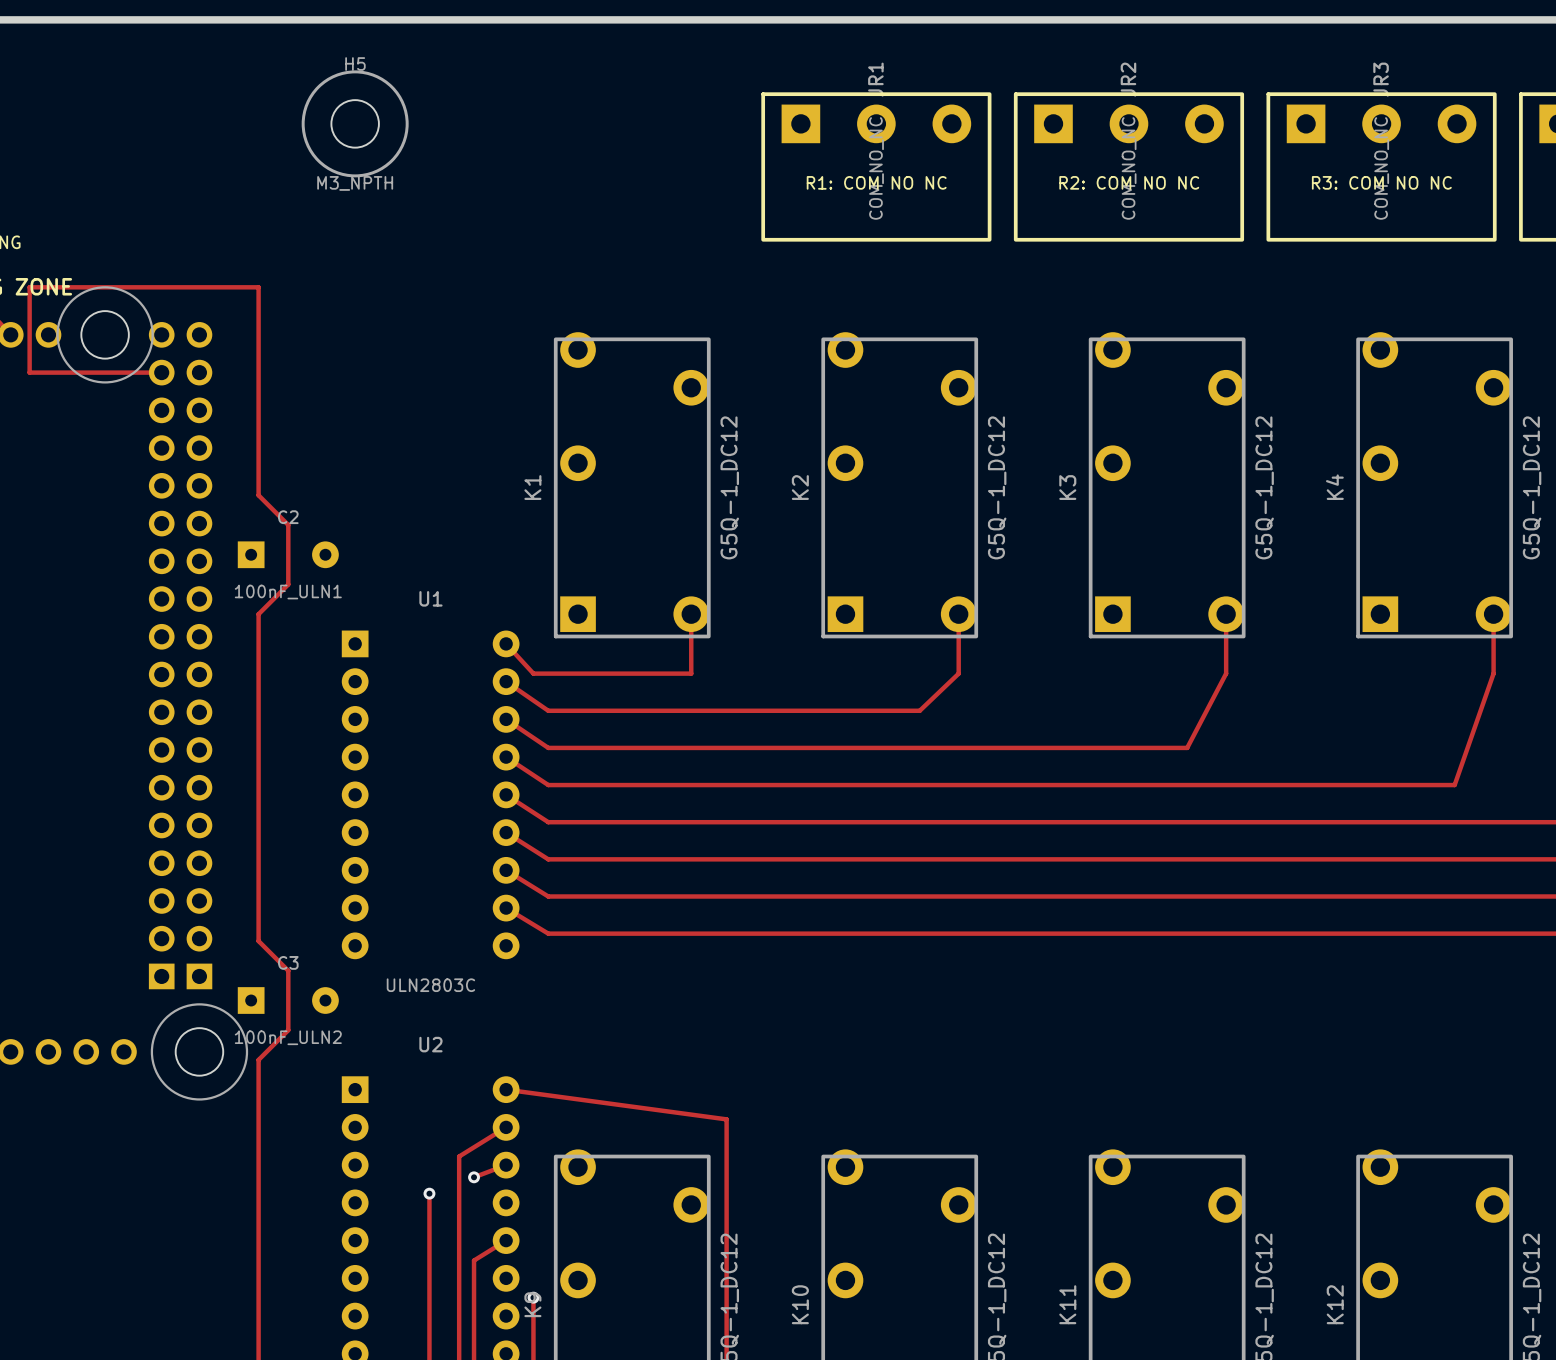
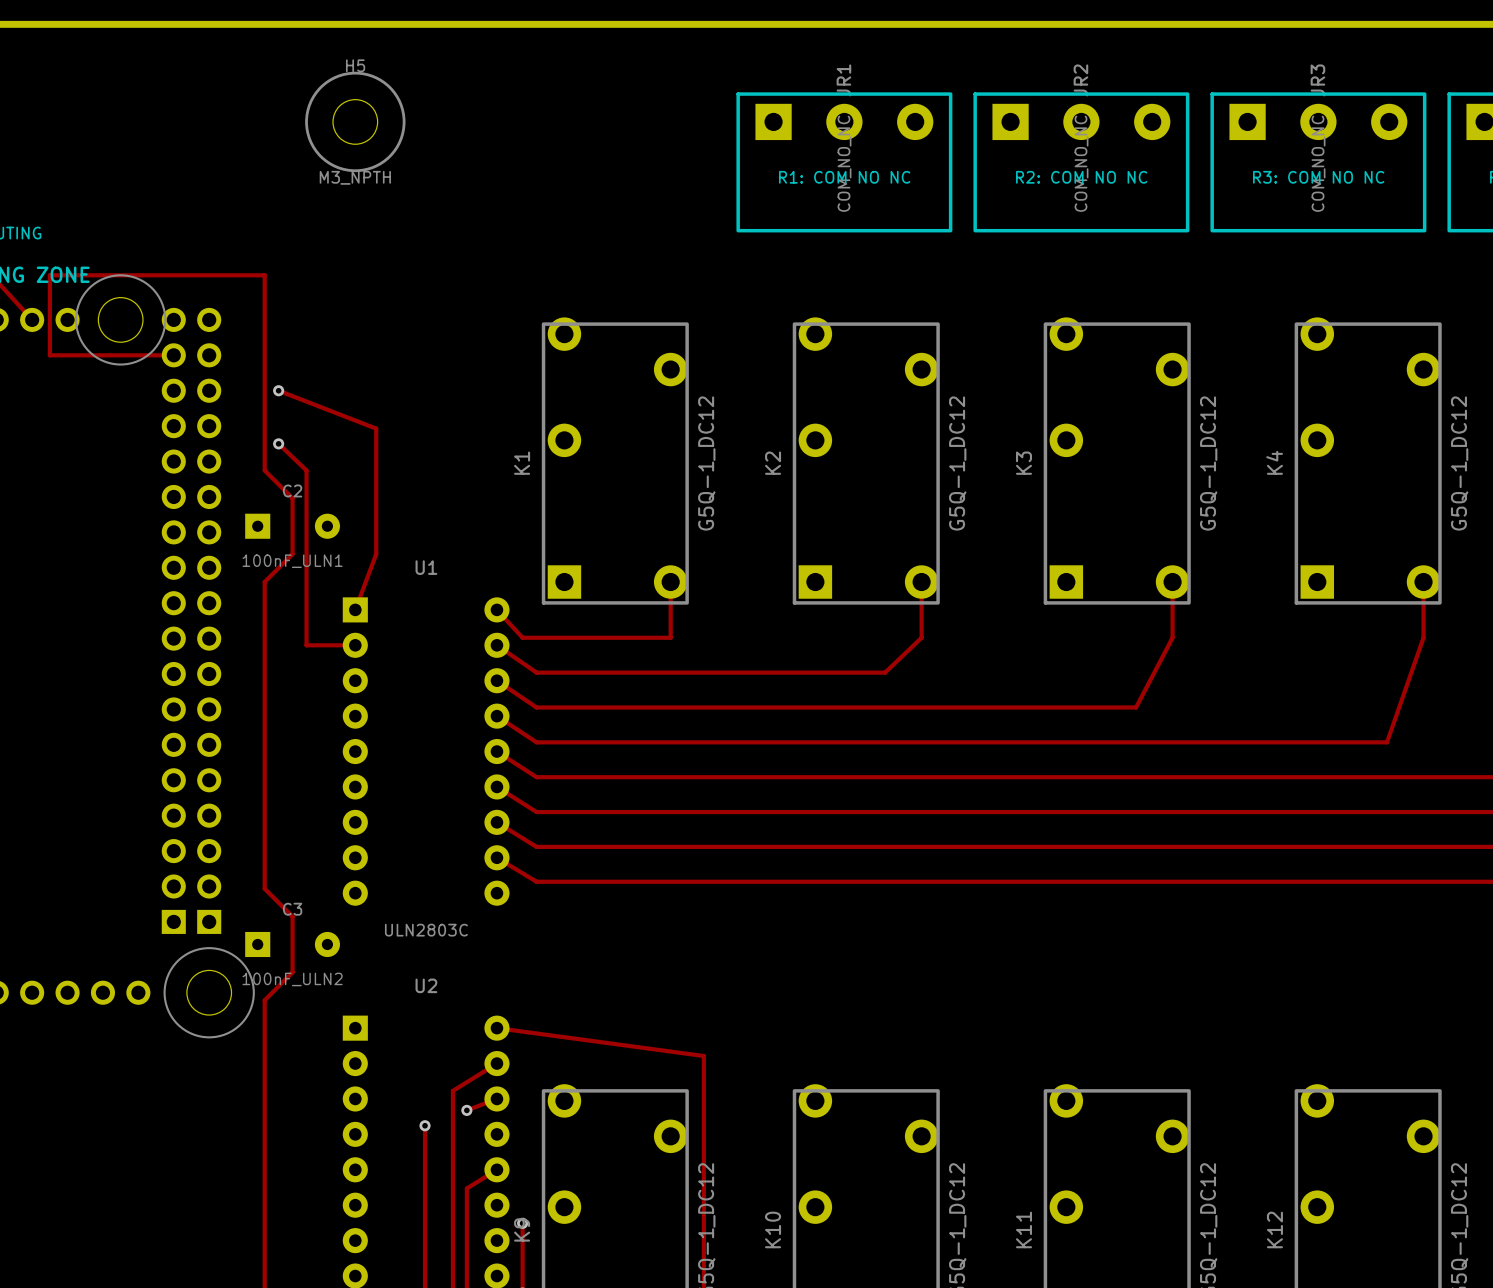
track: none -> (278, 390) (376, 428) (376, 554) (355, 609)
via: none -> (278, 390)
track: none -> (278, 443) (306, 470) (306, 645) (355, 645)
via: none -> (278, 443)

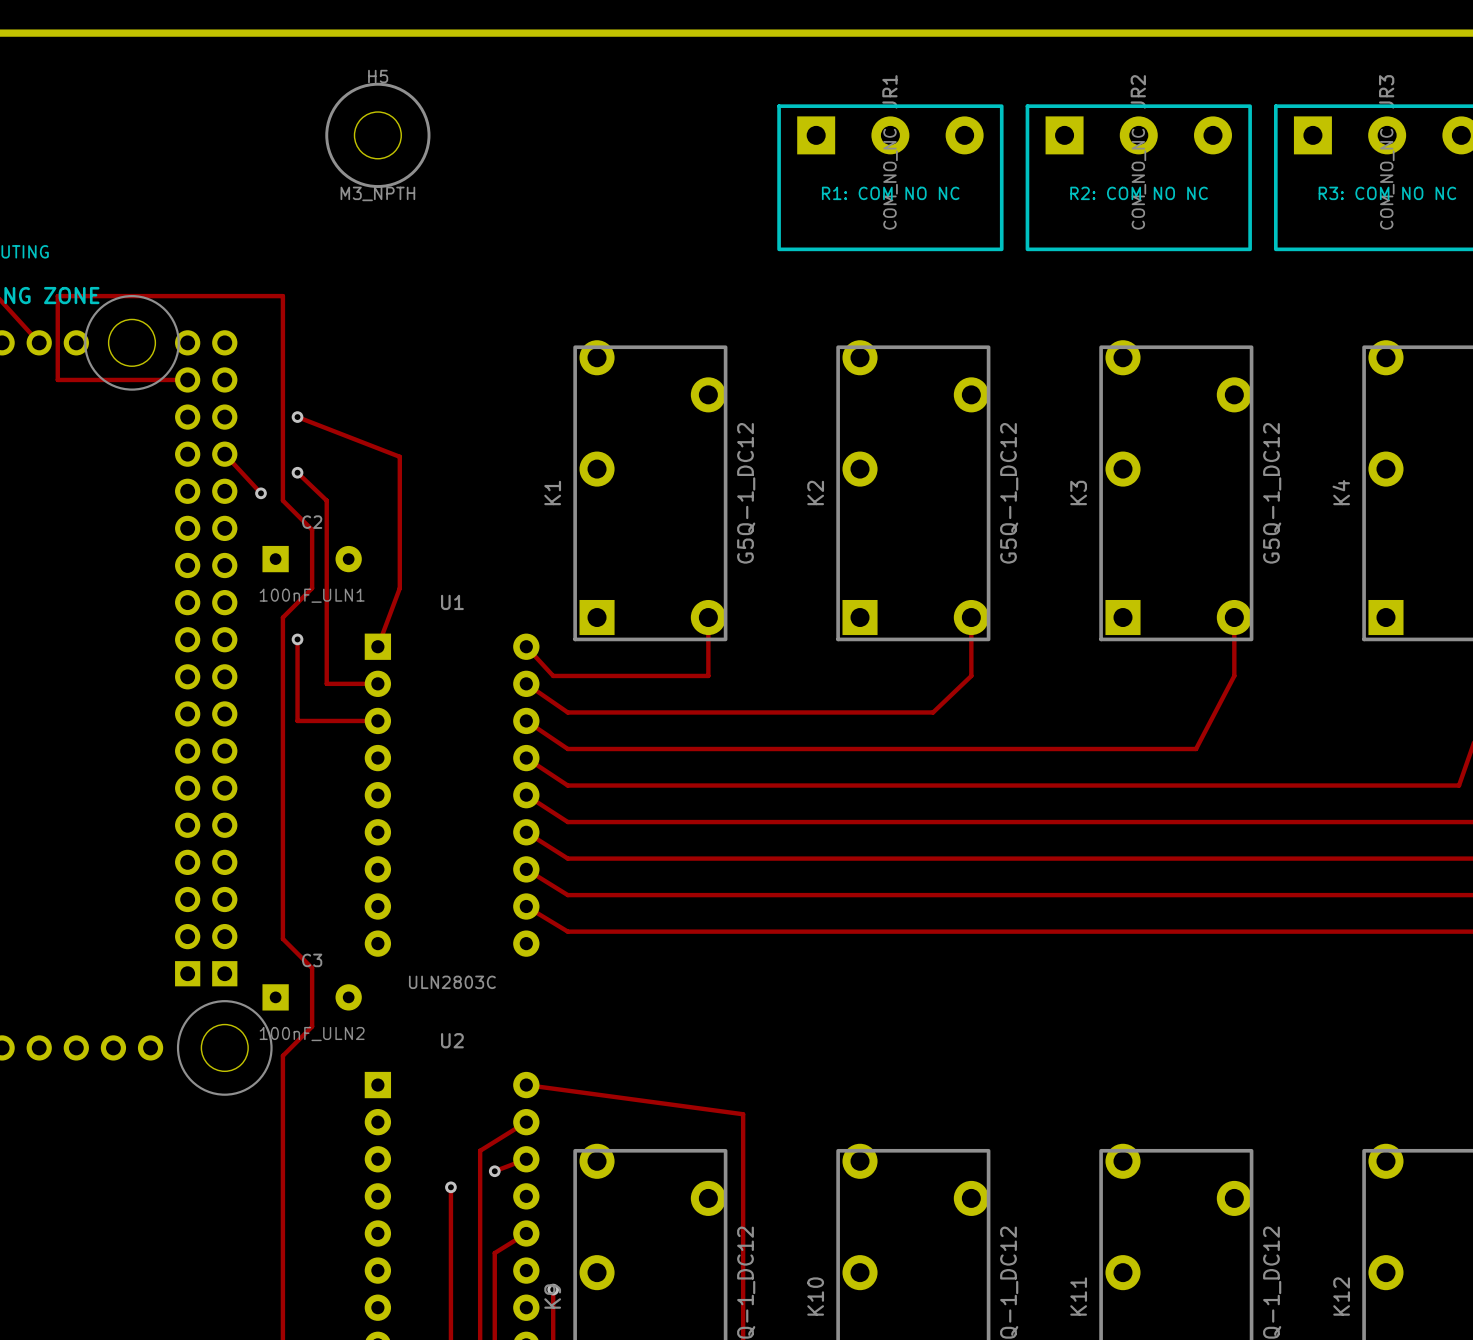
track: none -> (224, 454) (261, 493)
via: none -> (261, 493)
track: none -> (297, 639) (297, 720) (377, 720)
via: none -> (297, 639)

